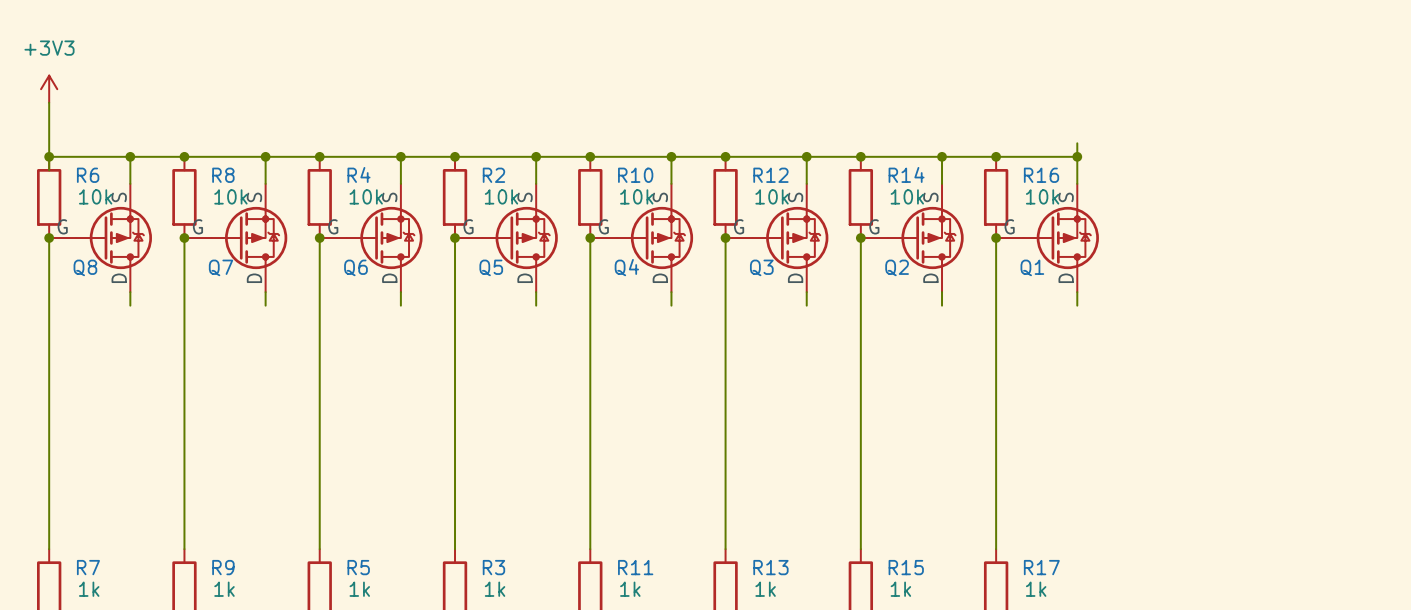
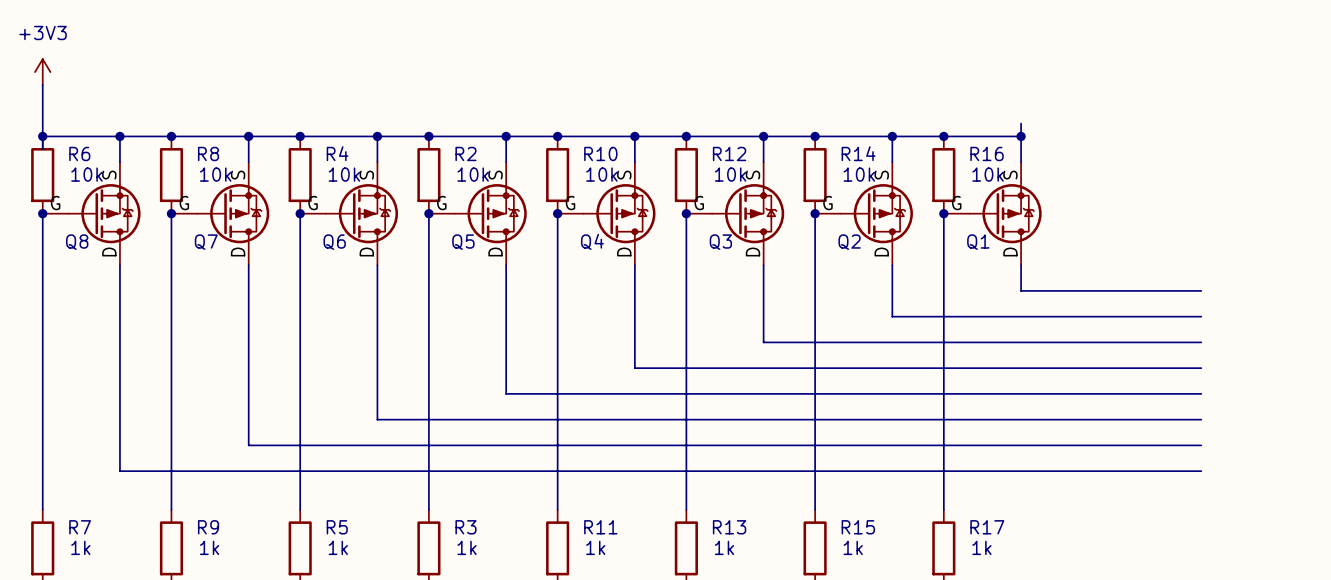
wire: none -> (119, 278) (119, 471) (1201, 471)
wire: none -> (248, 278) (248, 445) (1201, 445)
wire: none -> (377, 278) (377, 419) (1201, 419)
wire: none -> (506, 278) (506, 393) (1201, 393)
wire: none -> (634, 278) (634, 368) (1201, 368)
wire: none -> (763, 278) (763, 342) (1201, 342)
wire: none -> (892, 278) (892, 316) (1201, 316)
wire: none -> (1021, 278) (1021, 290) (1201, 290)

